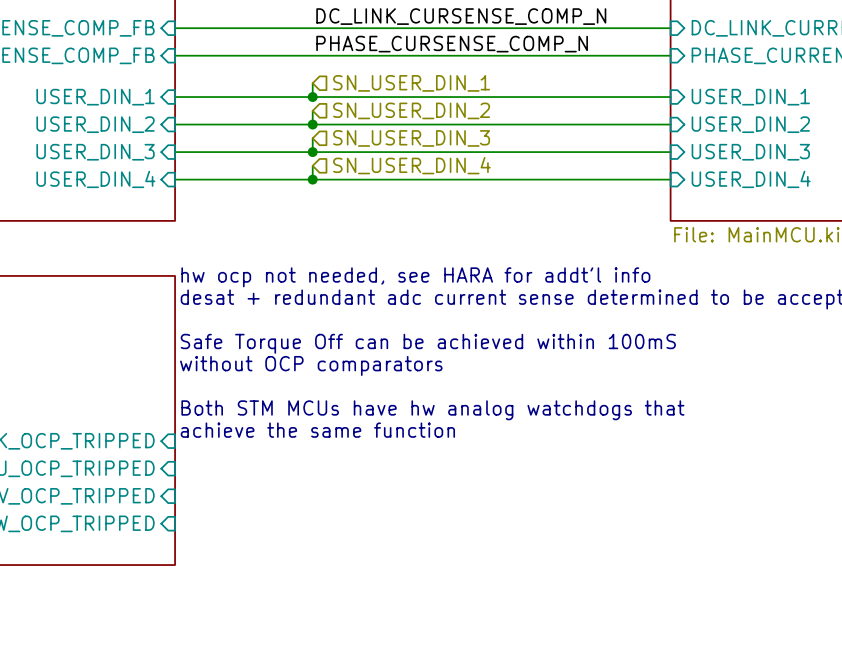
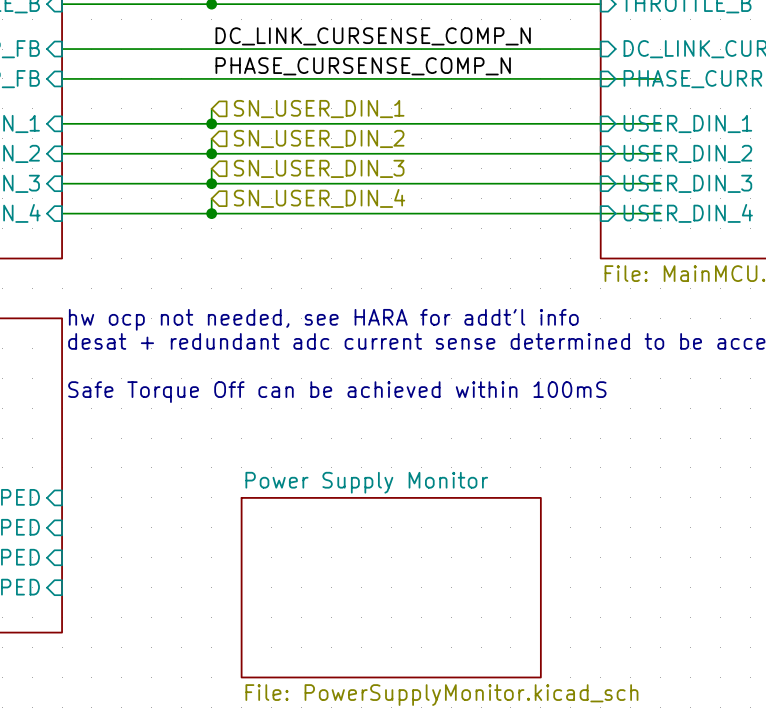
wire: none -> (600, 78) (660, 78)
wire: none -> (600, 123) (660, 123)
wire: none -> (600, 153) (660, 153)
wire: none -> (600, 183) (660, 183)
wire: none -> (600, 213) (660, 213)
text: without OCP comparators (311, 365) -> none
text: Both STM MCUs have hw analog watchdogs that (432, 410) -> none
text: achieve the same function (317, 430) -> none
sheet Power Supply Monitor: none -> File: PowerSupplyMonitor.kicad_sch (391, 587)

